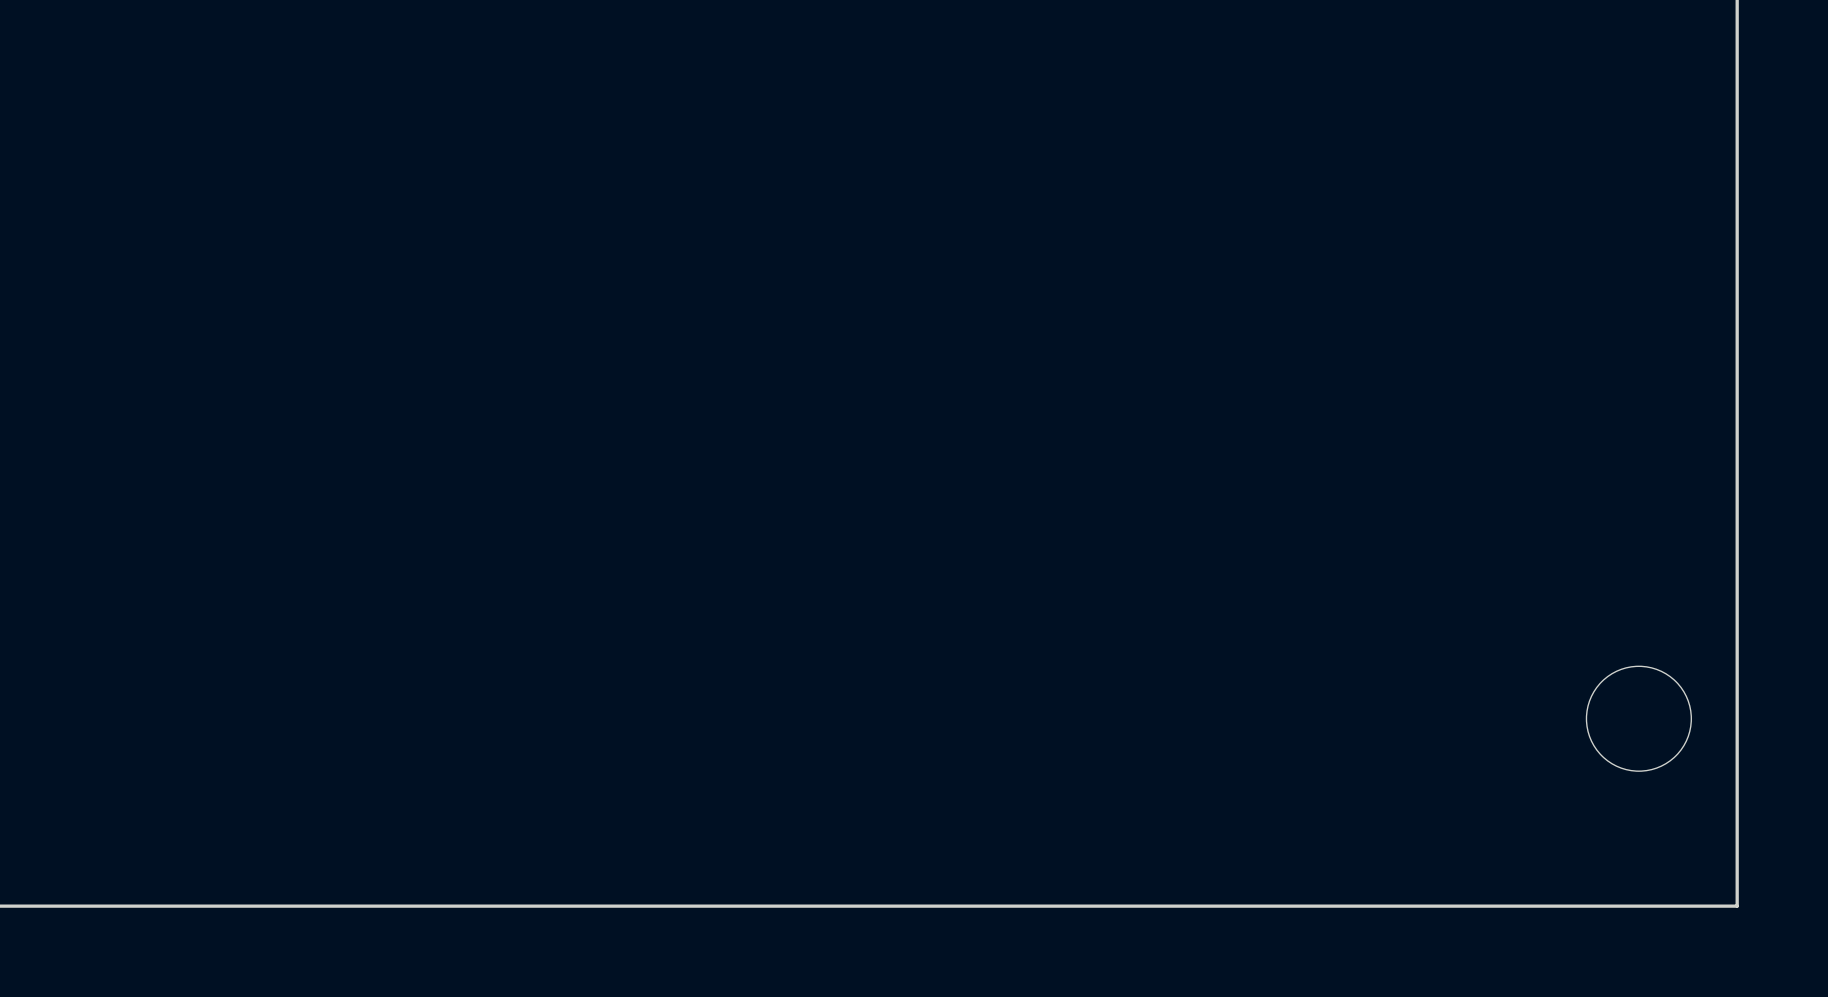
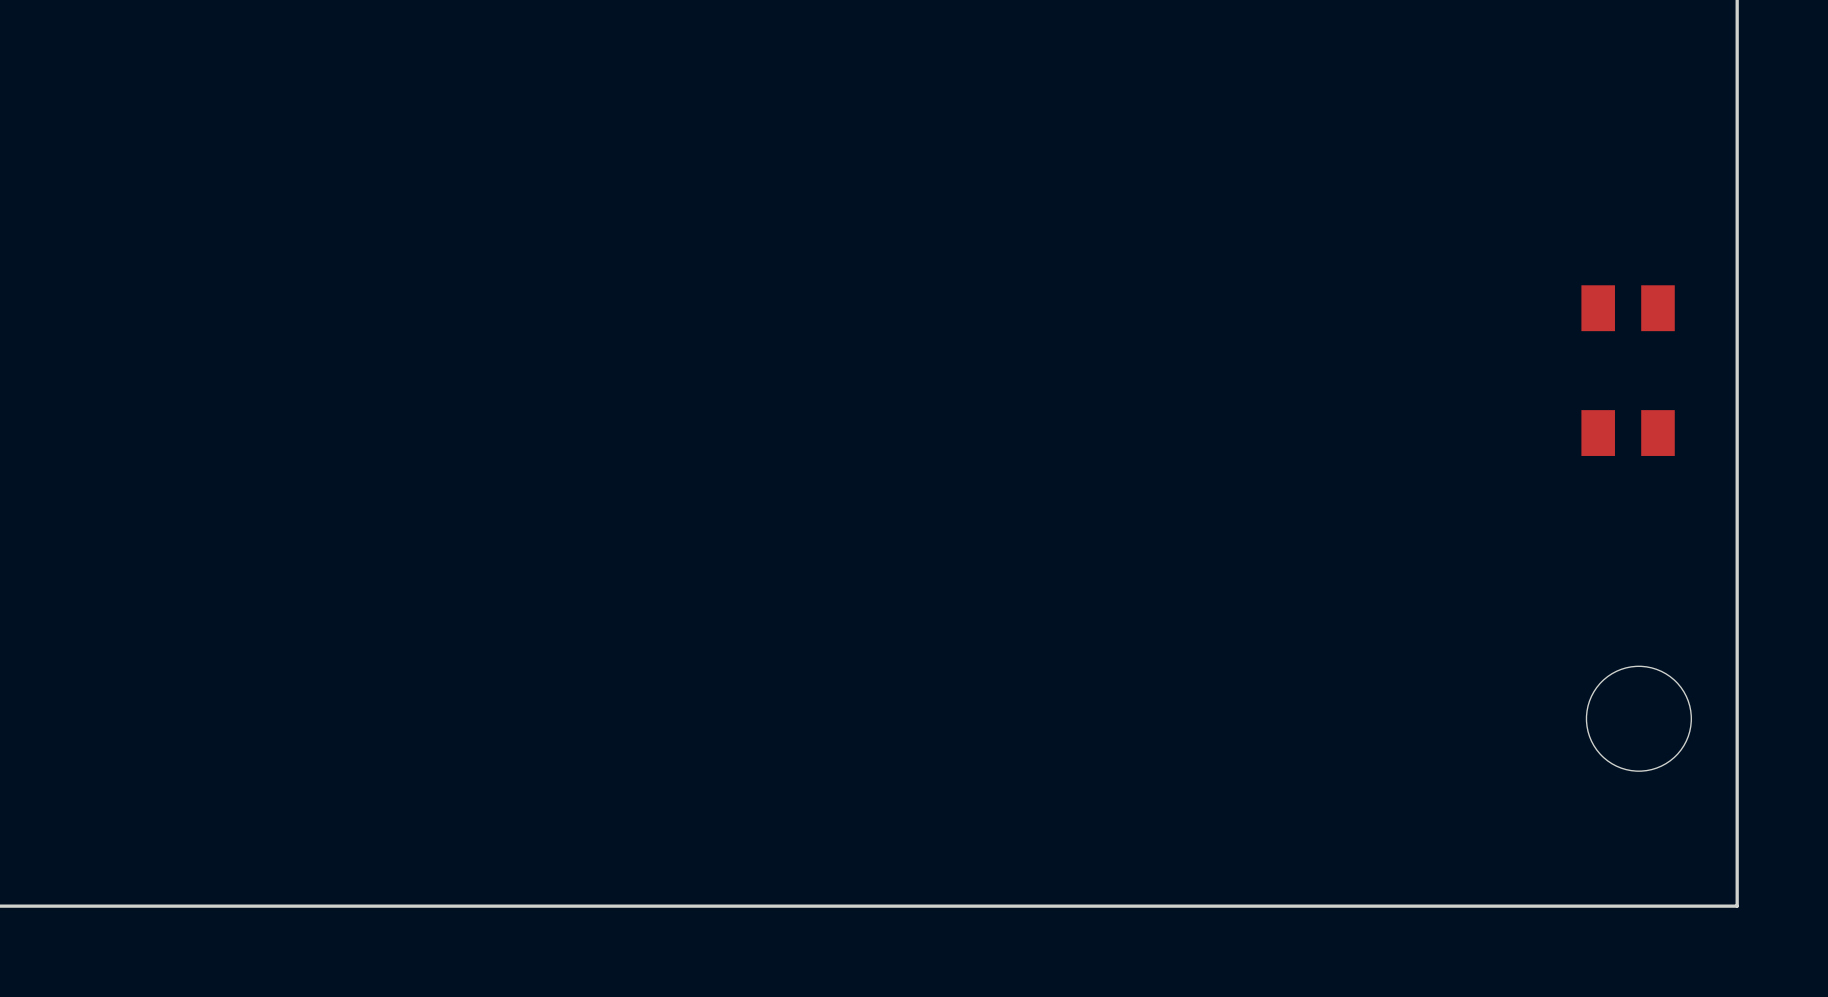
part: none -> (1628, 308)
part: none -> (1628, 433)

